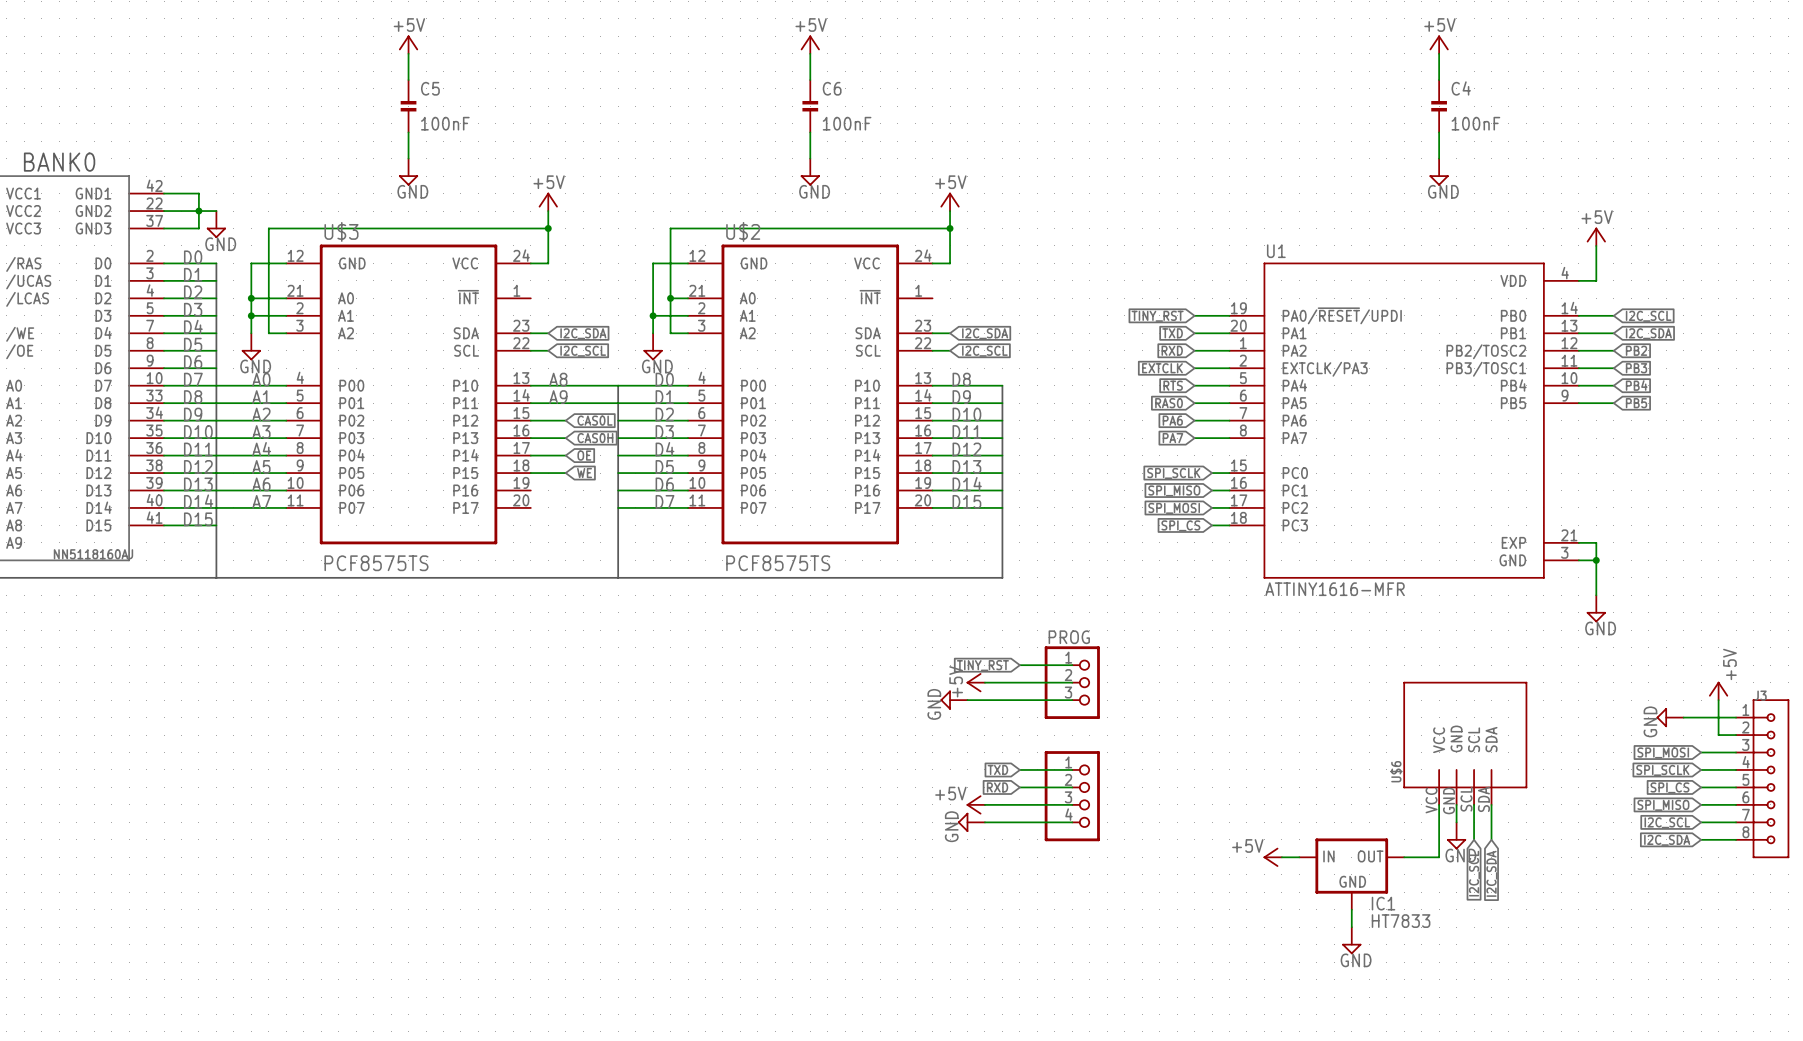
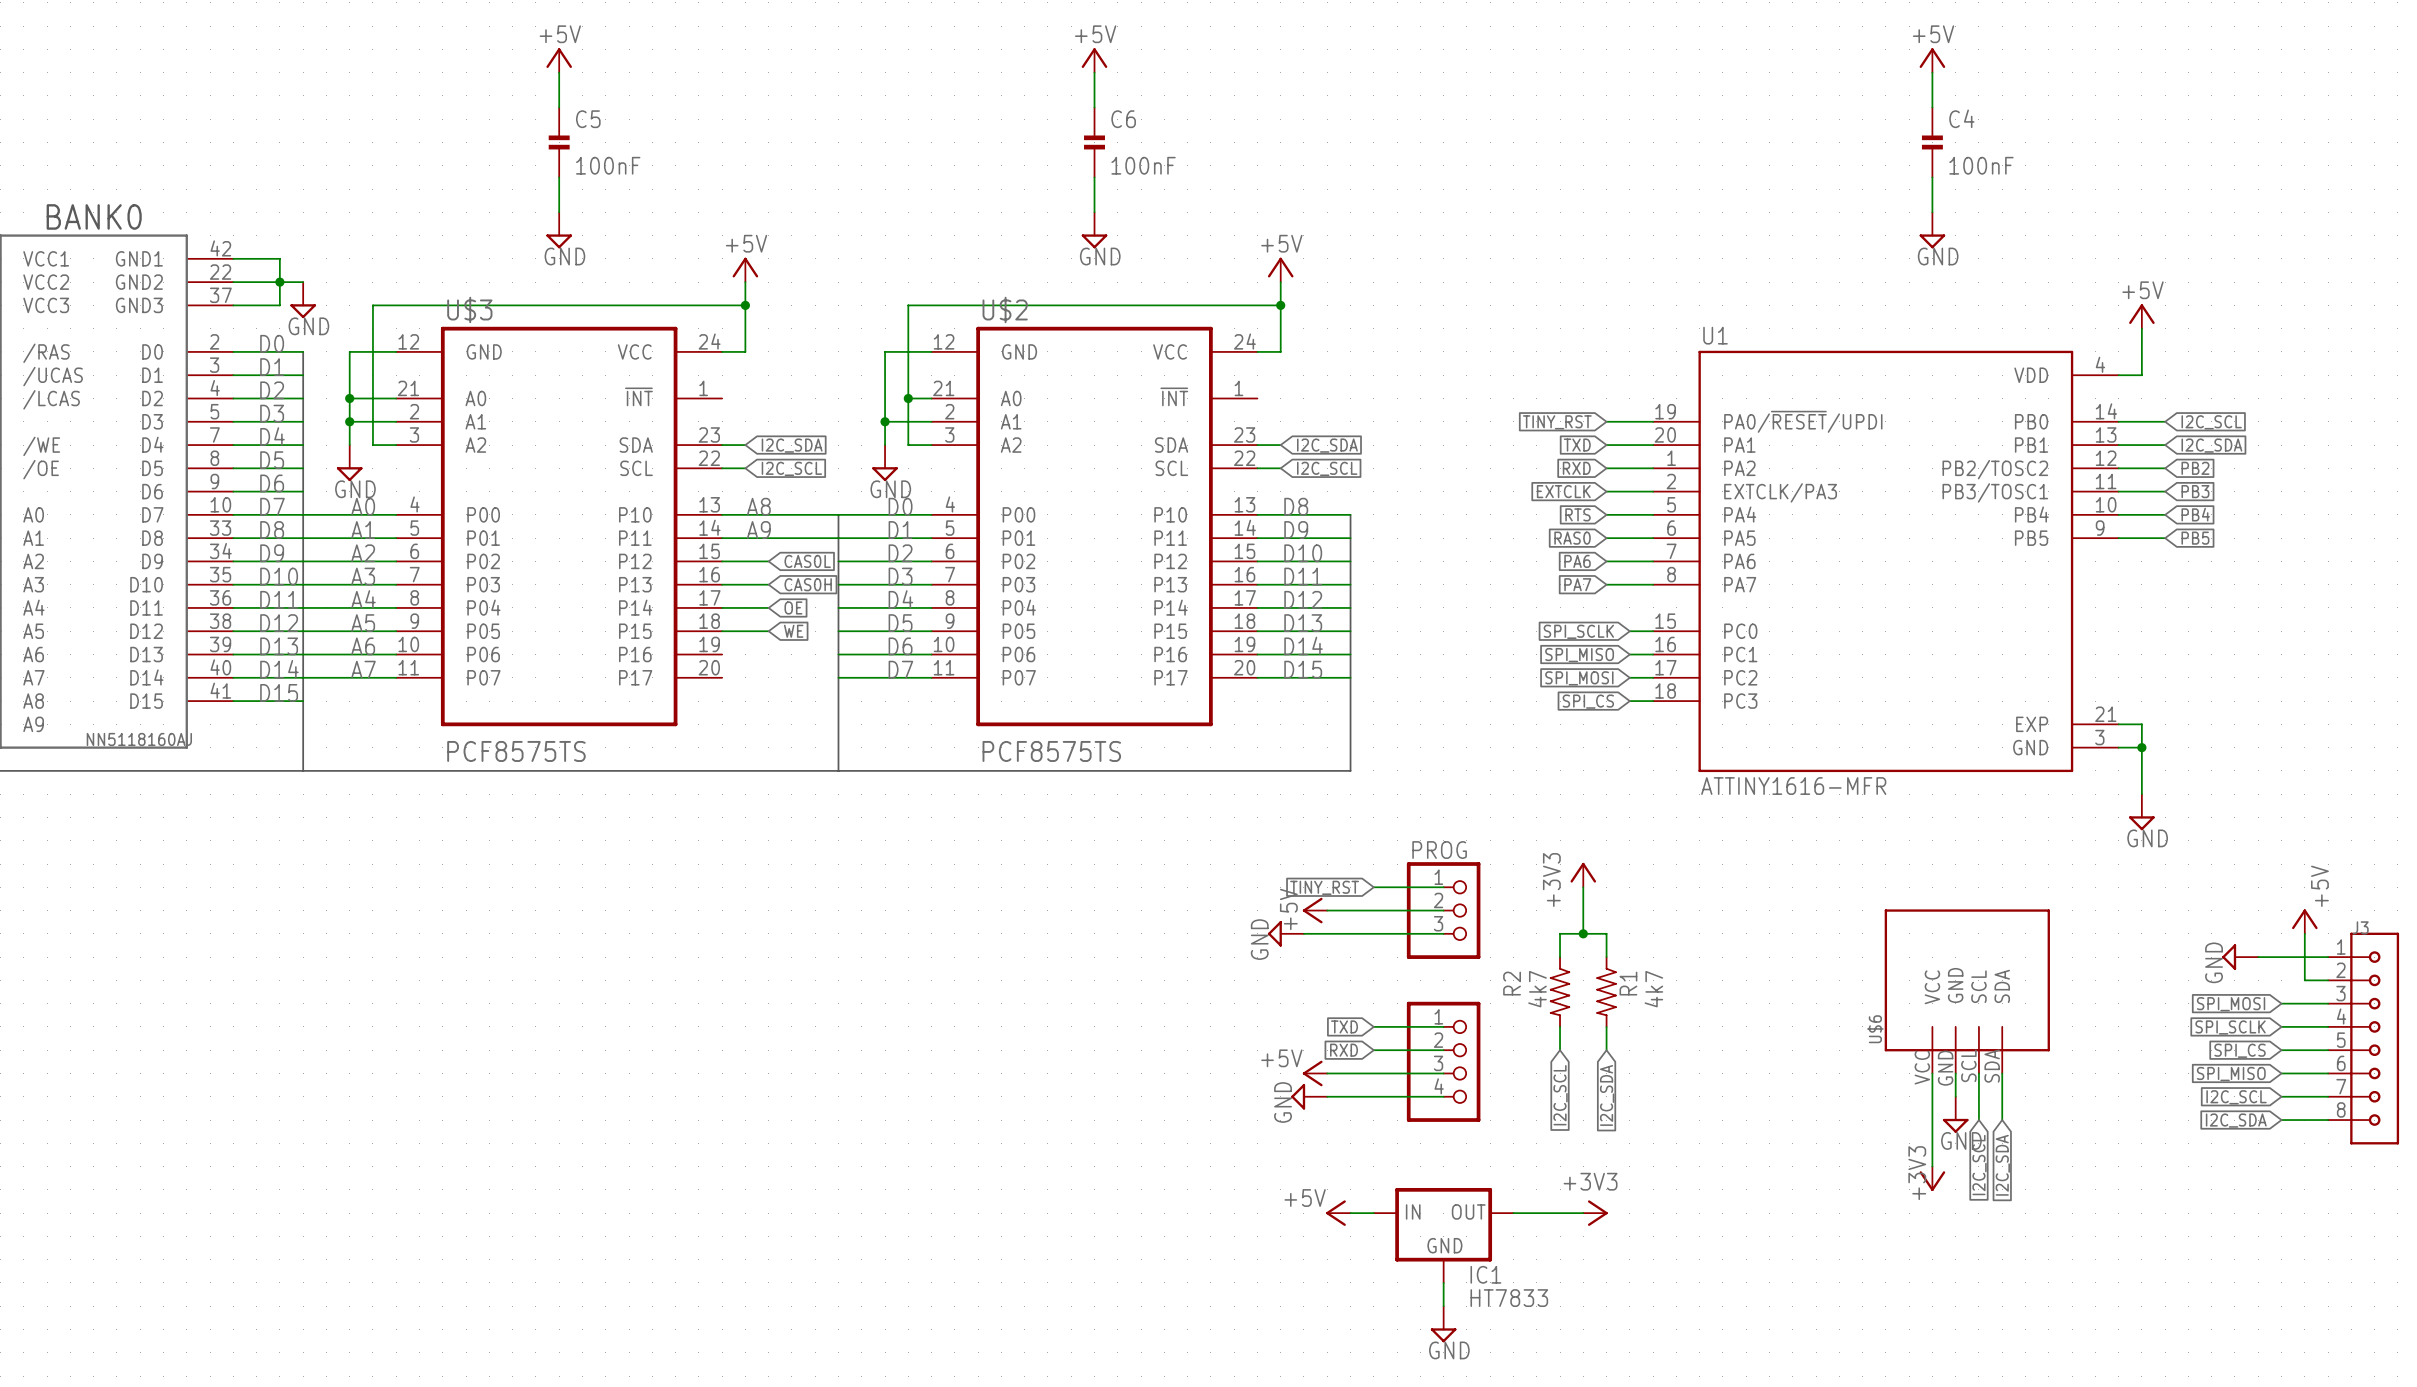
power symbol: none -> +3V3 (1583, 875)
wire: none -> (1583, 887) (1583, 933)
junction: none -> (1583, 933)
wire: none -> (1560, 957) (1560, 933) (1606, 933) (1606, 957)
R2: none -> 4k7 (1560, 992)
R1: none -> 4k7 (1606, 992)
wire: none -> (1560, 1026) (1560, 1050)
wire: none -> (1606, 1026) (1606, 1050)
global label: none -> I2C_SCL (1560, 1095)
global label: none -> I2C_SDA (1607, 1095)
power symbol: +5V (1272, 857) -> none
wire: (1281, 857) (1299, 857) -> none
wire: (1404, 857) (1439, 857) -> (1932, 1166) (1932, 1143)
IC1 position: (1351, 874) -> (1443, 1235)
power symbol: none -> +3V3 (1932, 1178)
power symbol: none -> +5V (1338, 1213)
wire: none -> (1350, 1213) (1373, 1213)
wire: none -> (1513, 1213) (1583, 1213)
power symbol: none -> +3V3 (1595, 1213)
wire: (1351, 909) (1351, 927) -> none
power symbol: GND (1351, 940) -> none
wire: none -> (1443, 1282) (1443, 1306)
power symbol: none -> GND (1443, 1324)

